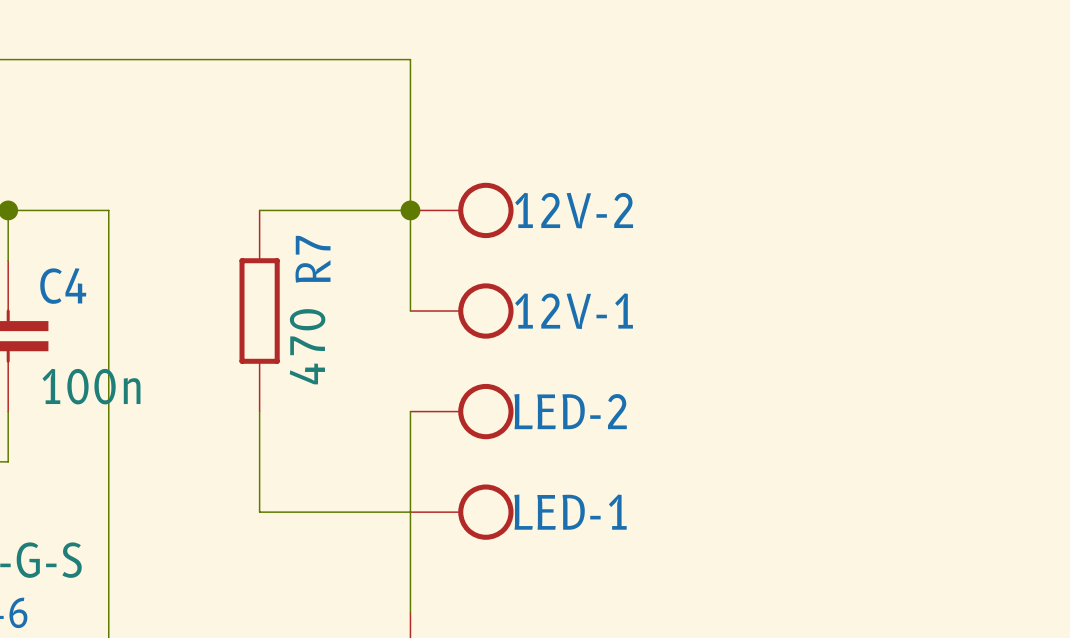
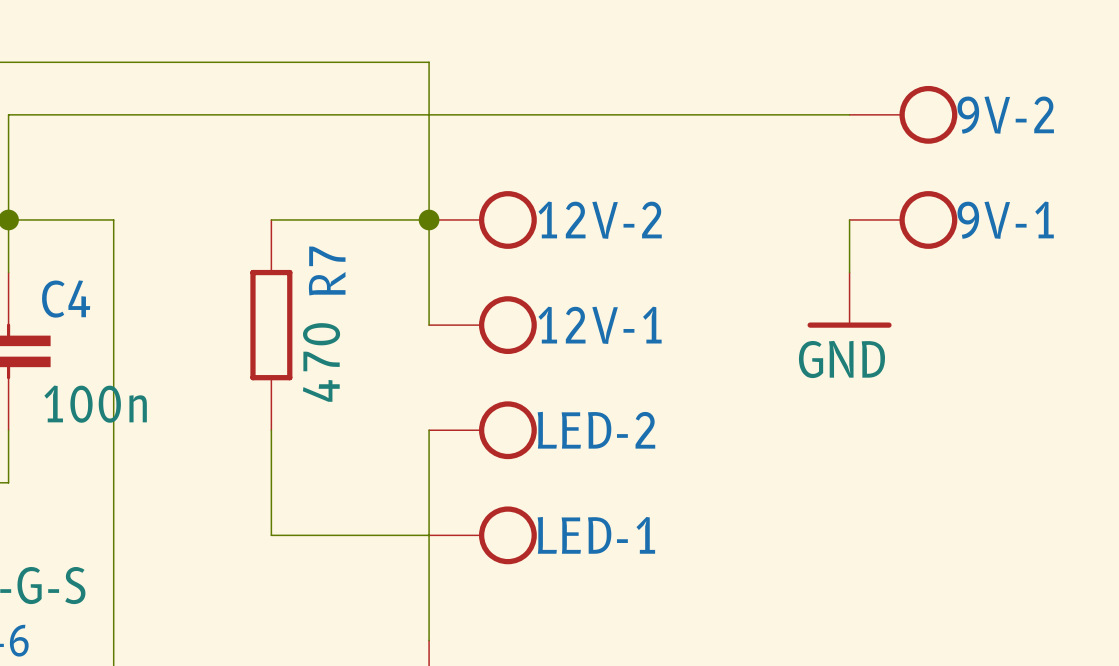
wire: none -> (849, 114) (8, 114) (8, 219)
9V-2: none -> (903, 114)
wire: none -> (849, 219) (849, 272)
9V-1: none -> (903, 219)
power symbol: none -> GND (849, 300)

